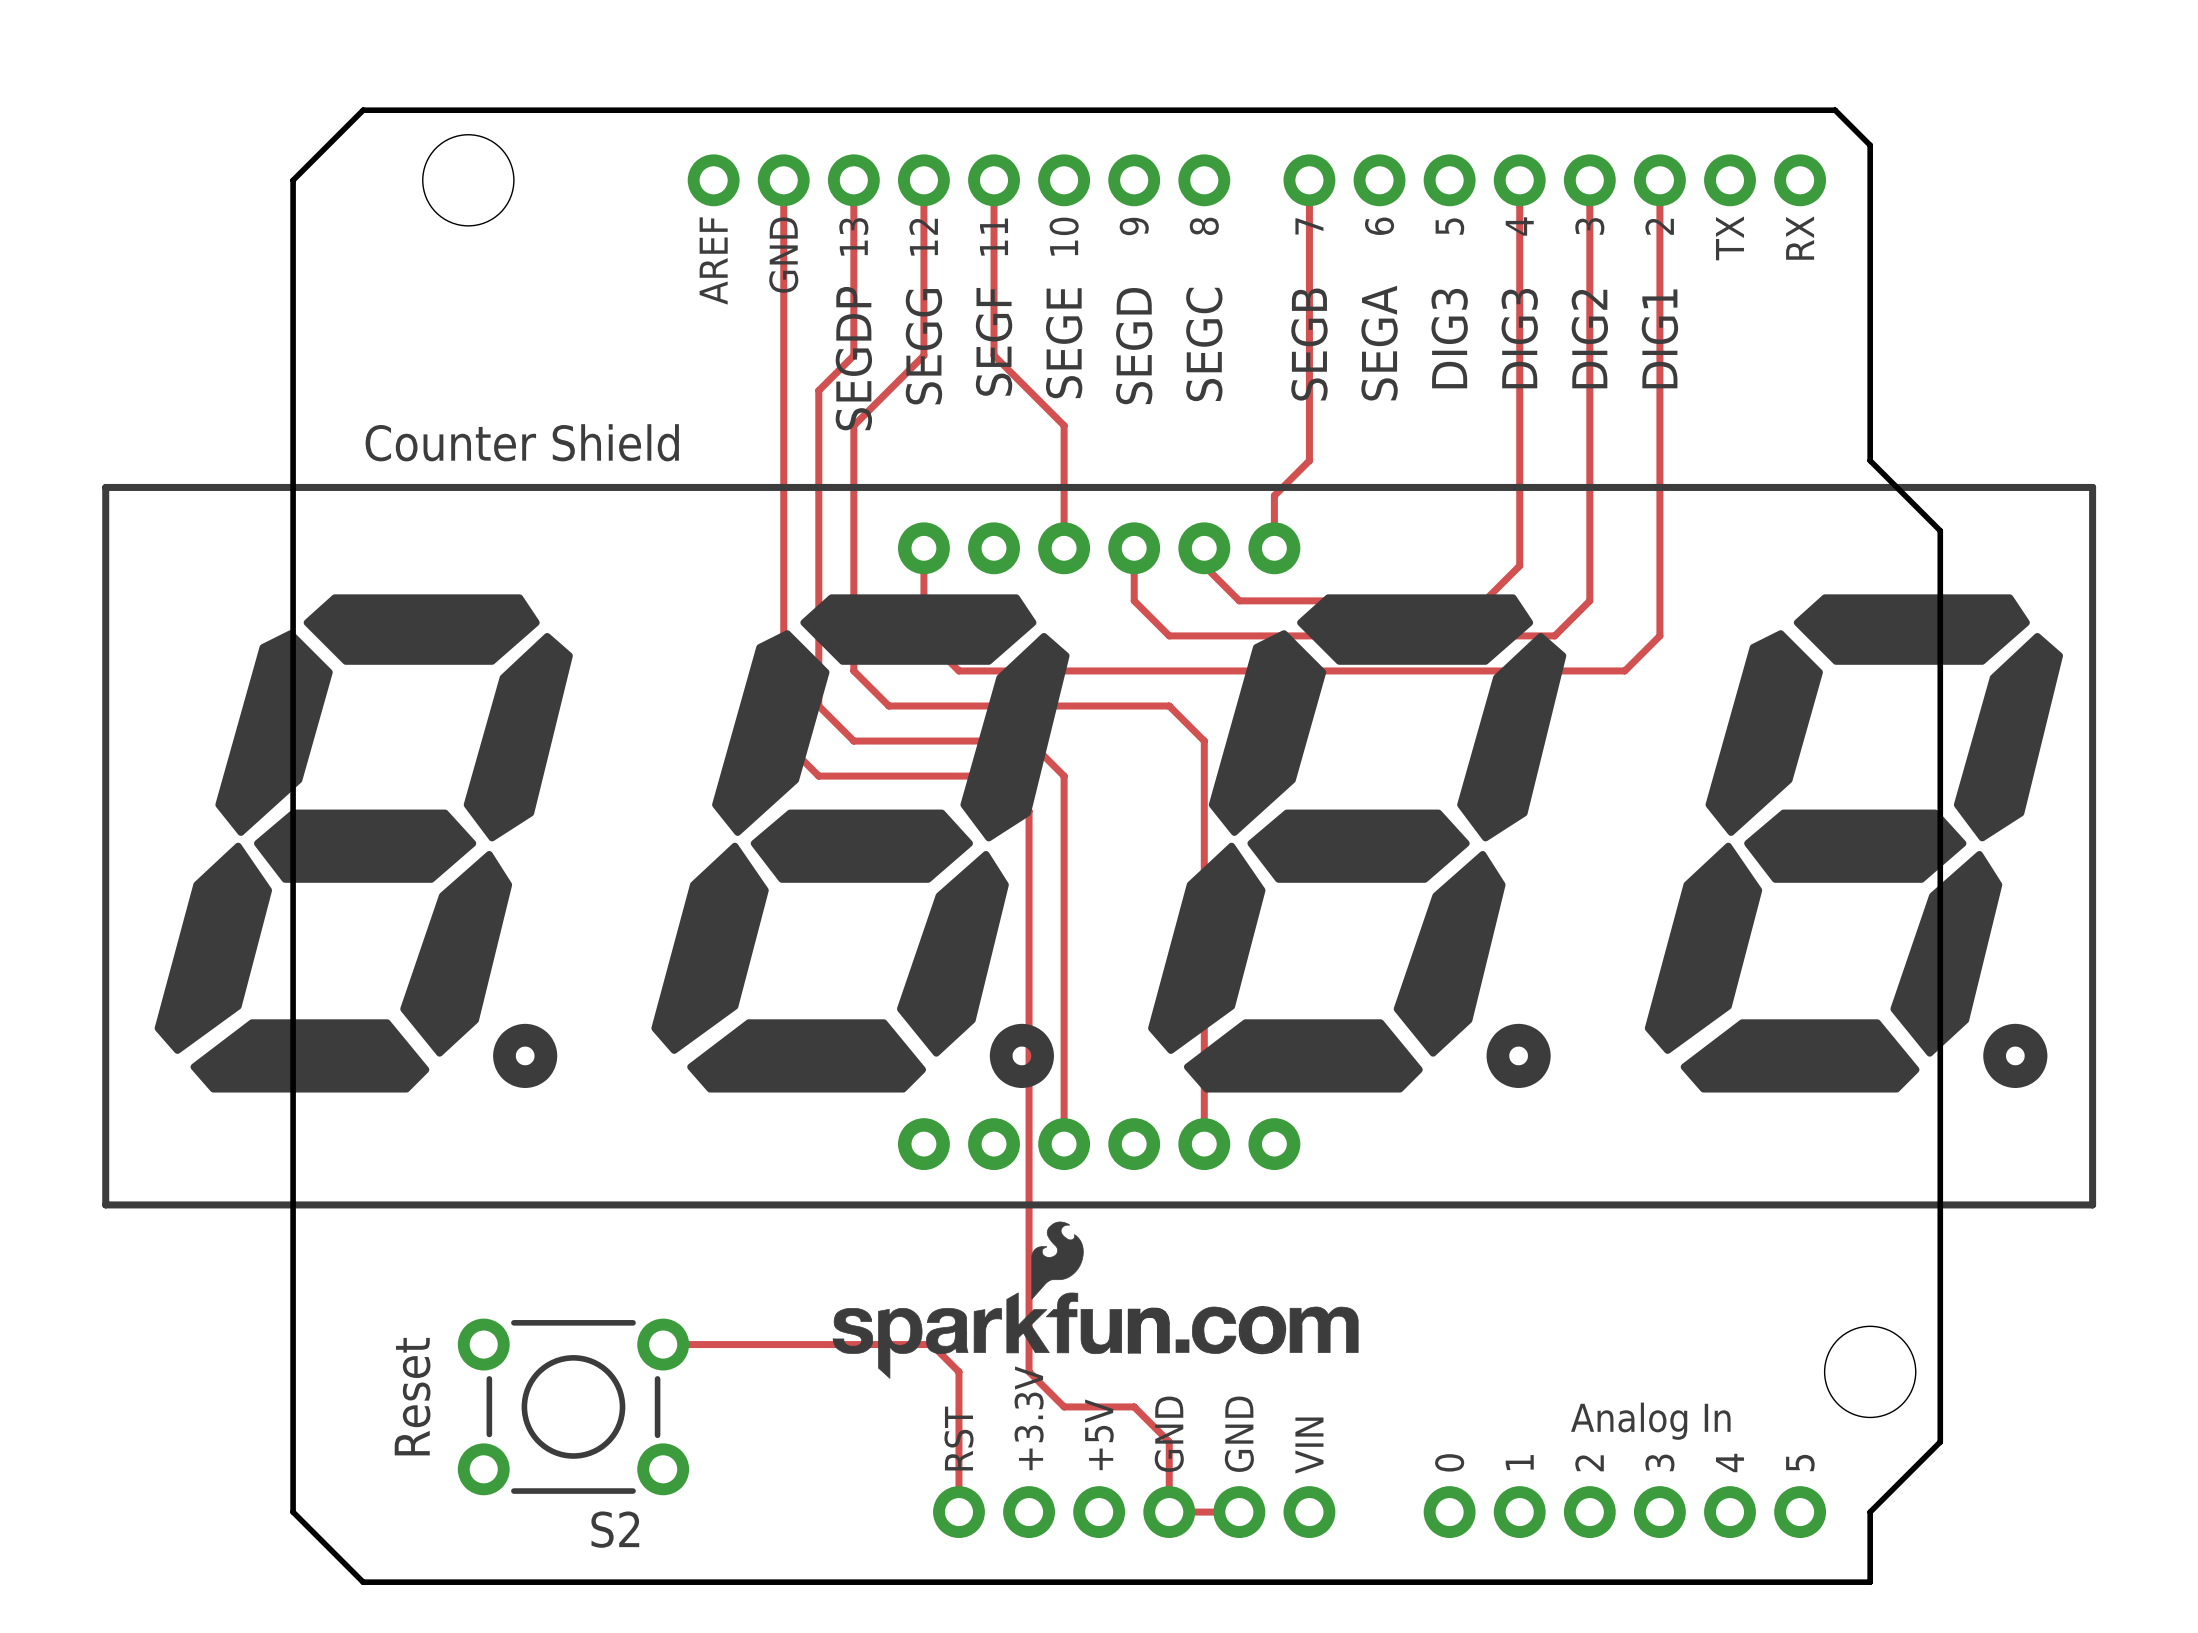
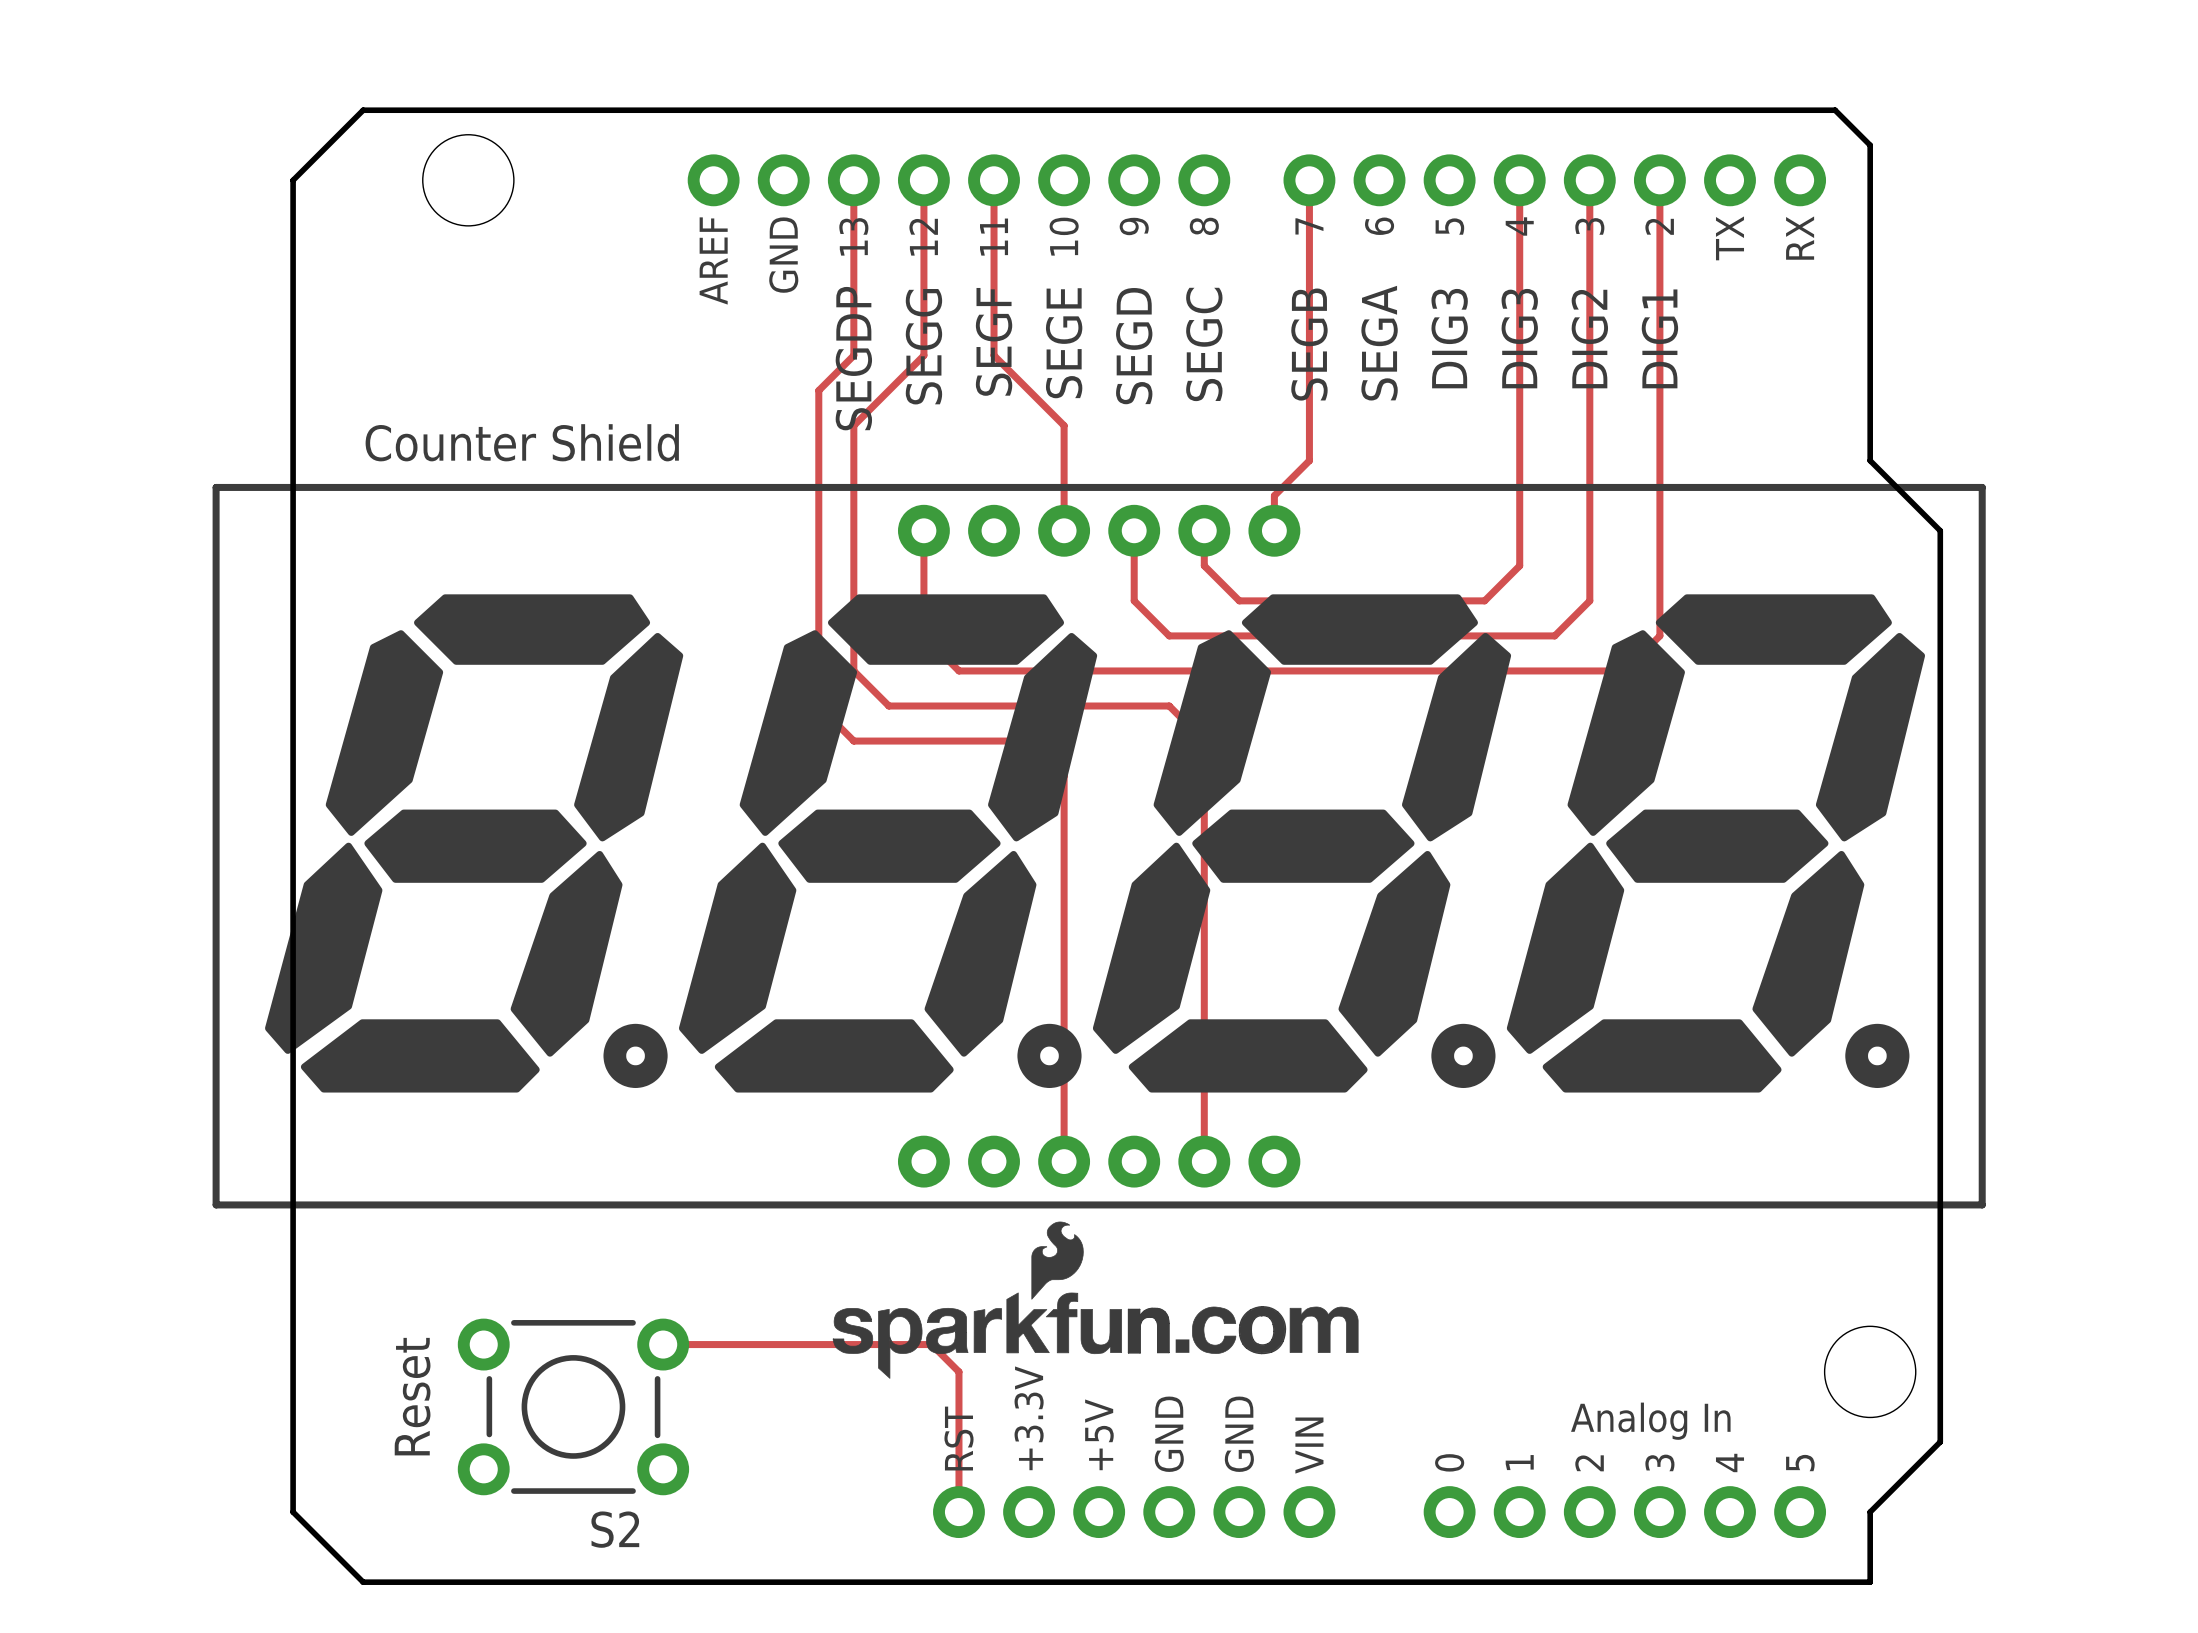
track: (783, 180) (783, 741) (818, 776) (994, 776) (1029, 811) (1029, 1371) (1064, 1406) (1134, 1406) (1169, 1441) (1169, 1512) (1239, 1512) -> none
part footprint: [102, 483, 2097, 1209] -> [212, 483, 1986, 1209]

